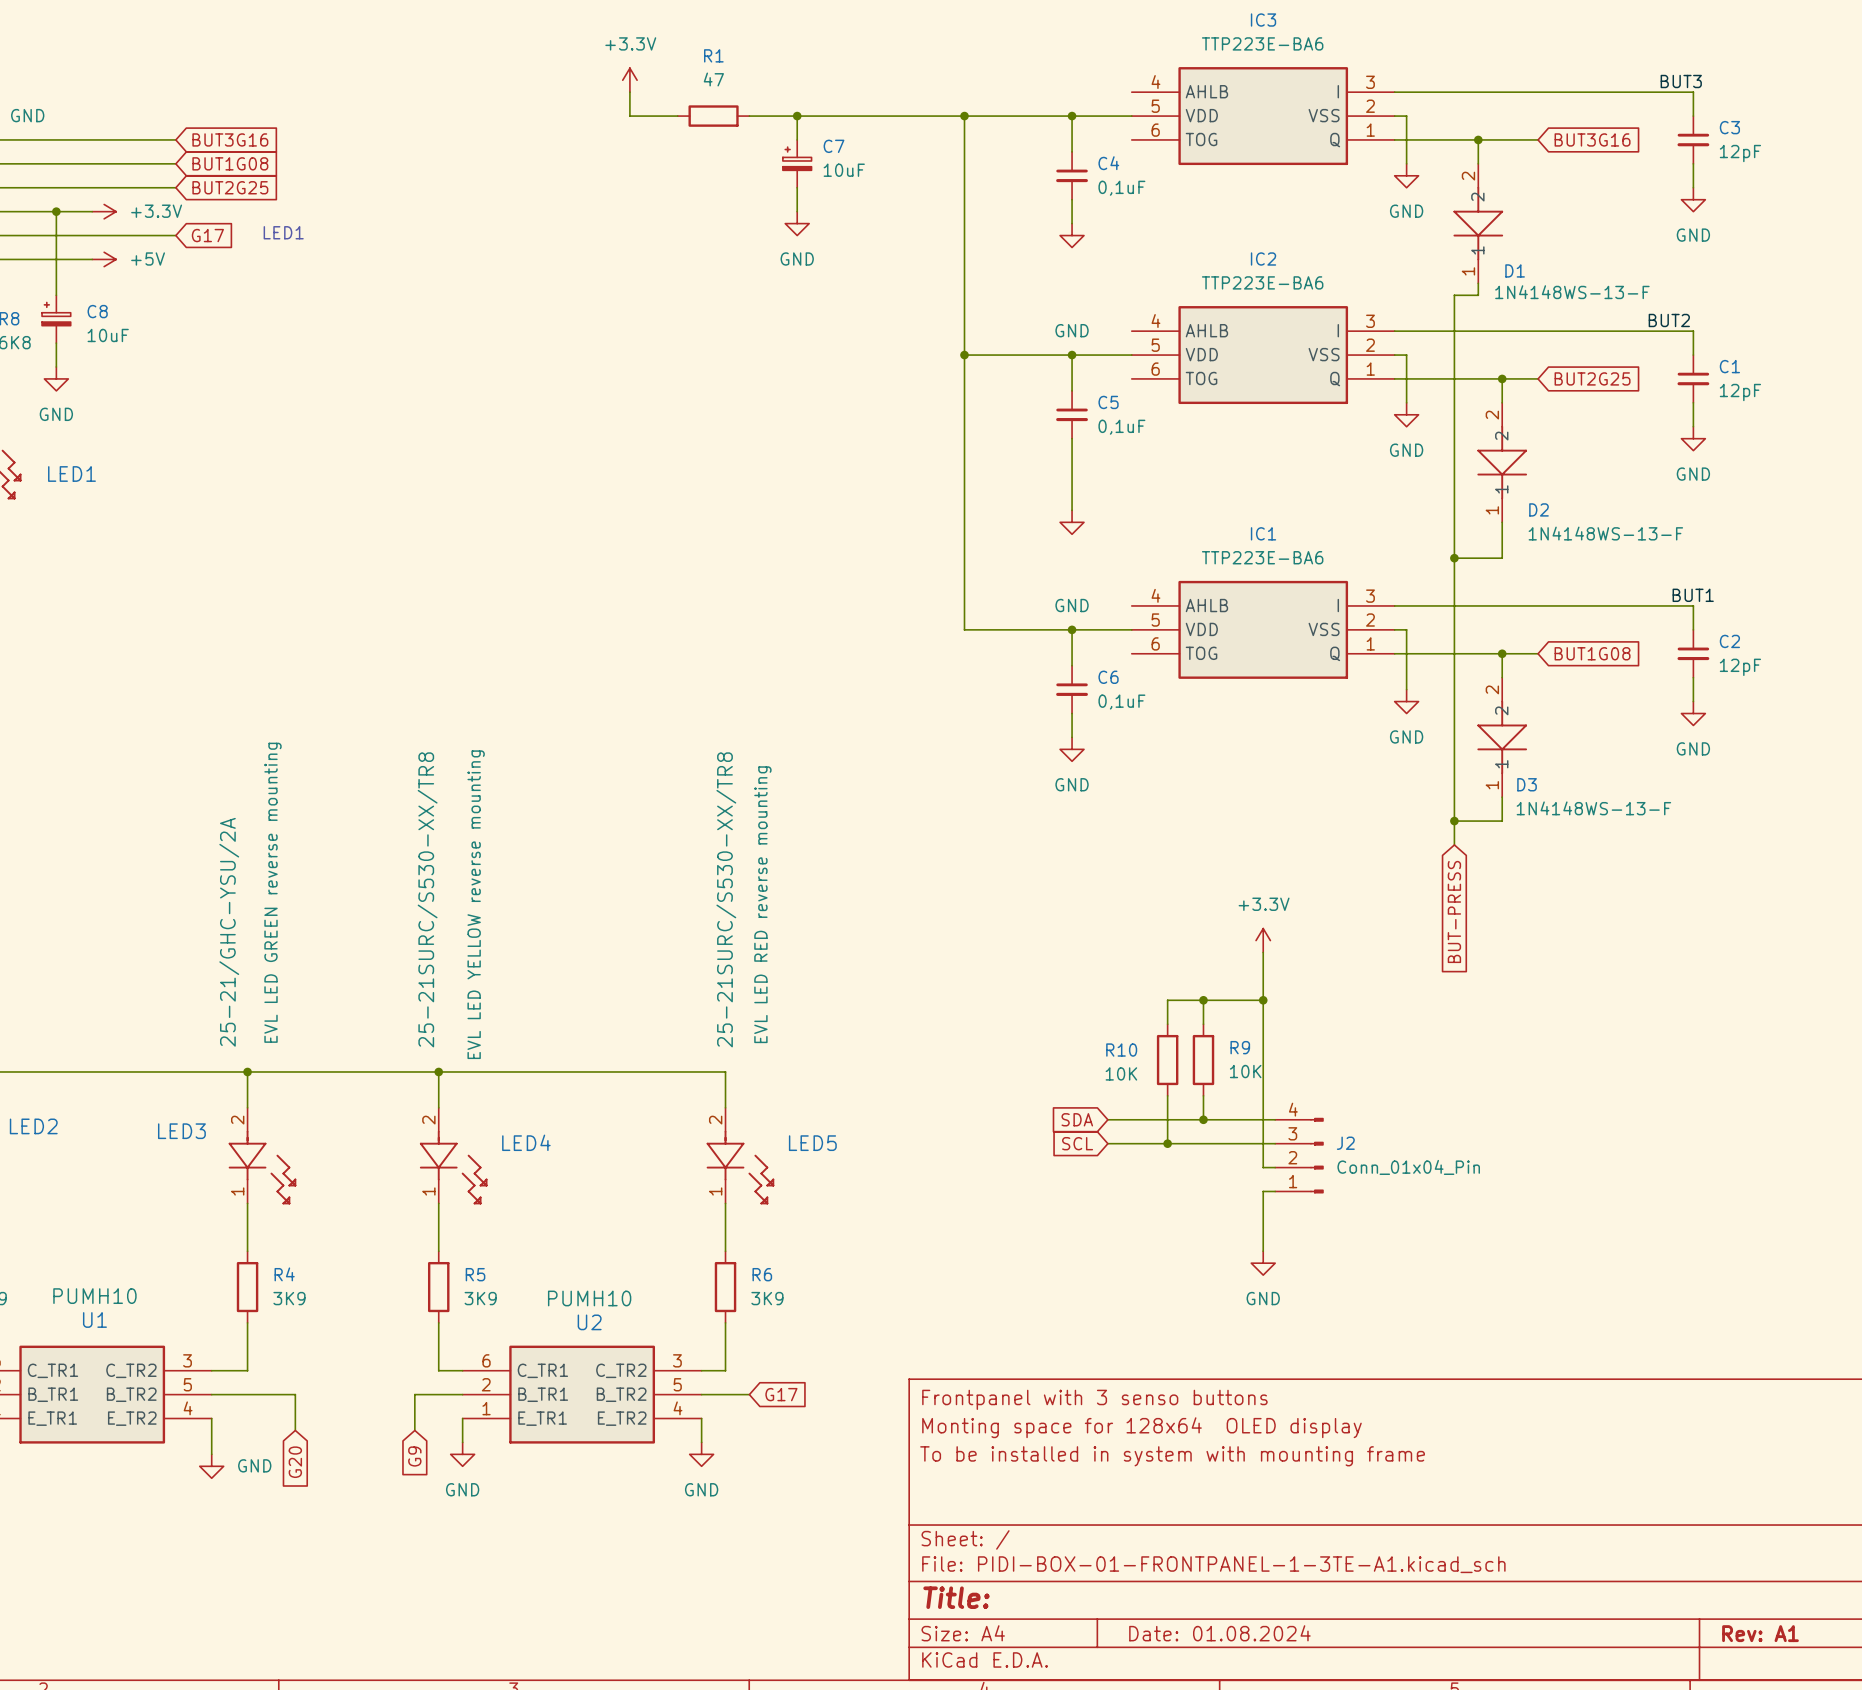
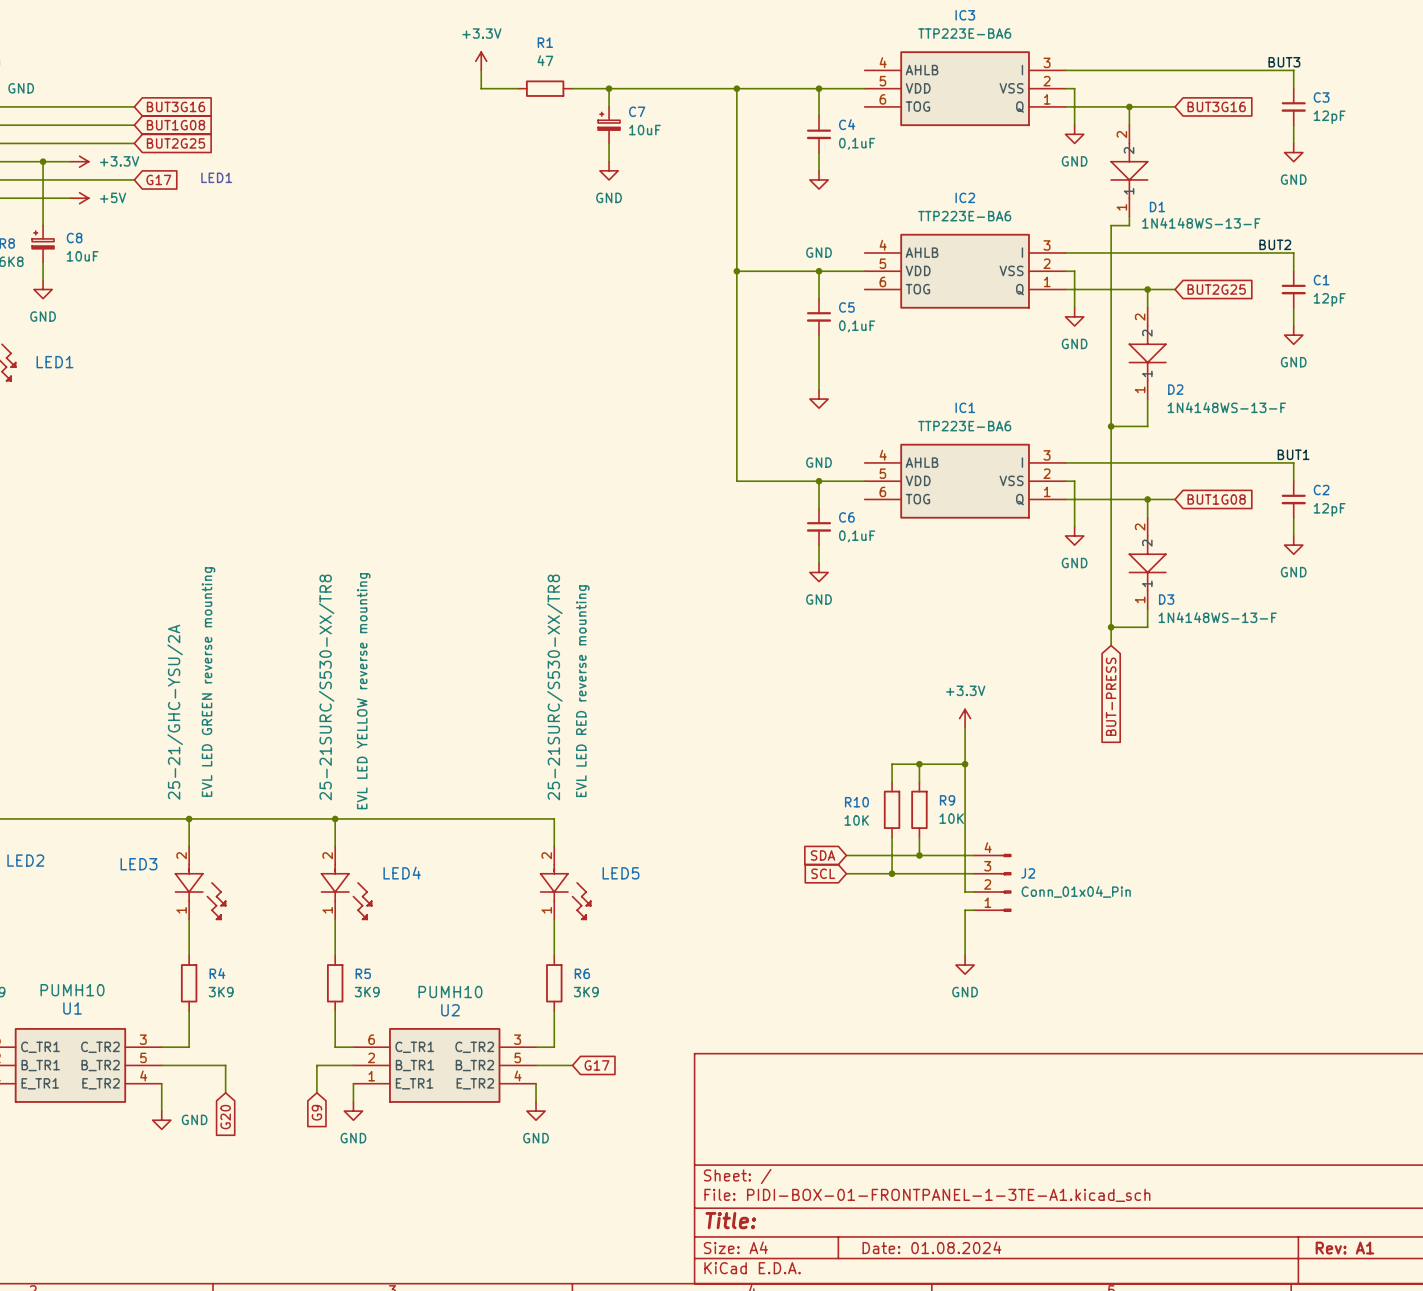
title block: Frontpanel with 3 senso buttons (1094, 1399) -> none
title block: Monting space for 128x64 OLED display (1141, 1427) -> none
title block: To be installed in system with mounting frame (1172, 1456) -> none

